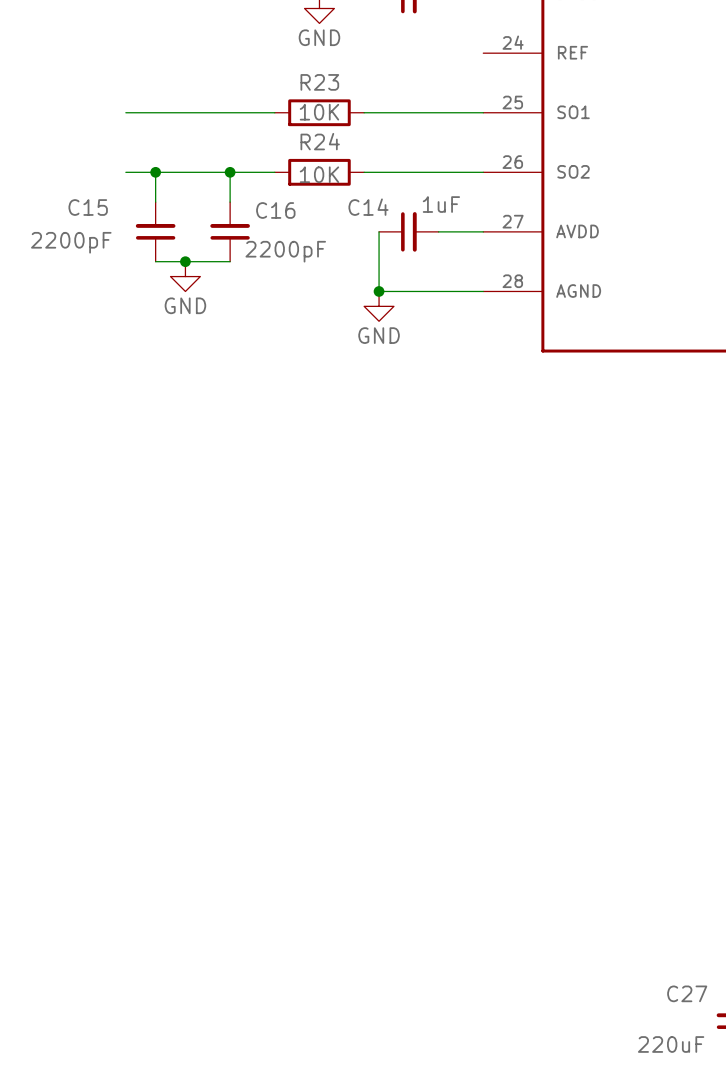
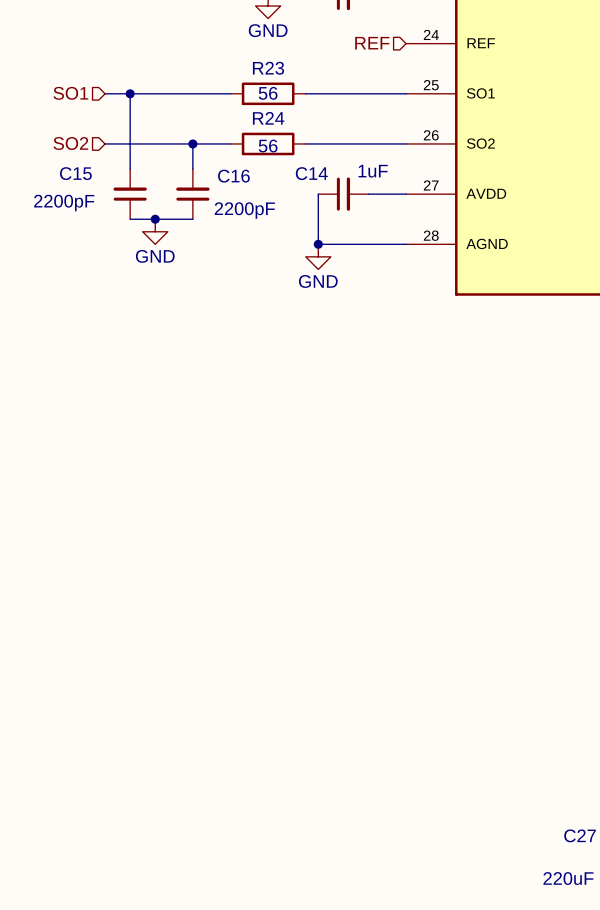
hierarchical label: none -> REF (372, 43)
hierarchical label: none -> SO1 (70, 93)
wire: none -> (130, 93) (130, 143)
R23 value: 10K (319, 112) -> 56 (268, 93)
hierarchical label: none -> SO2 (70, 143)
junction position: (155, 172) -> (130, 93)
R24 value: 10K (319, 174) -> 56 (268, 146)

